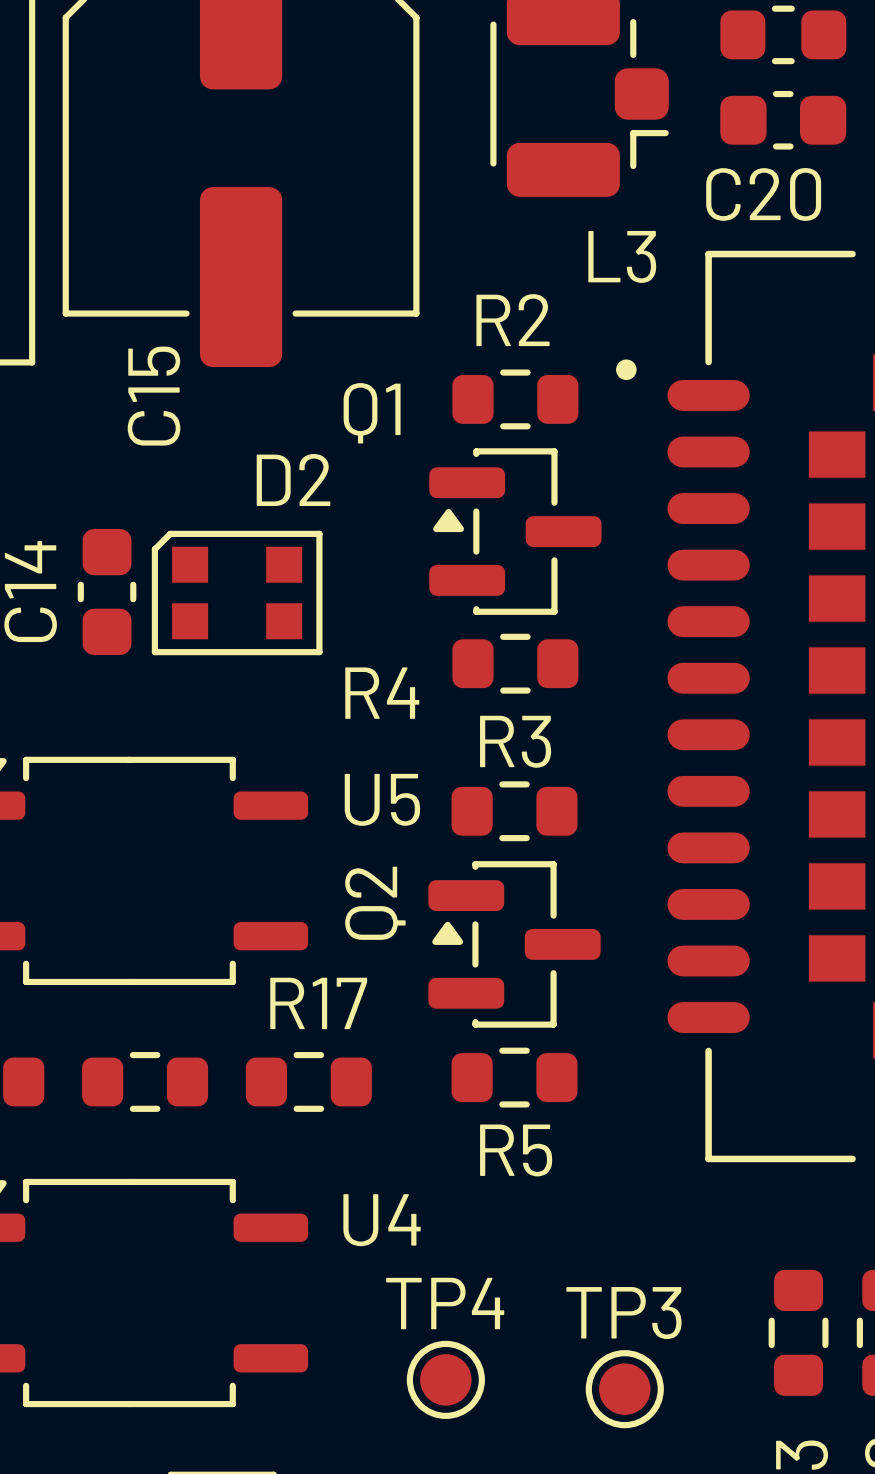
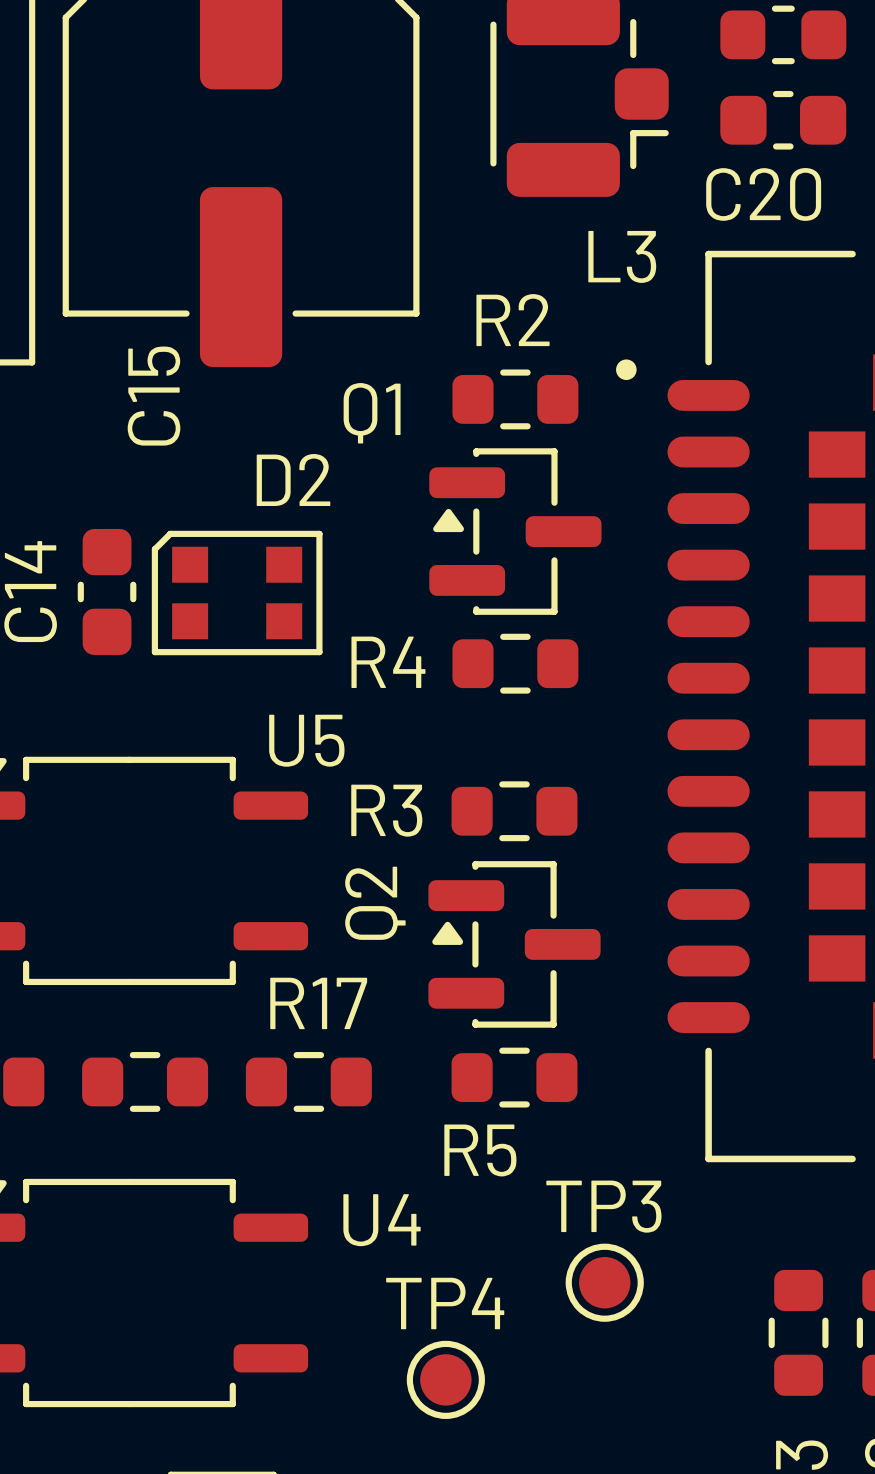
R4 name position: R4 (382, 693) -> R4 (388, 662)
R3 name position: R3 (515, 741) -> R3 (386, 810)
U5 name position: U5 (382, 799) -> U5 (306, 740)
R5 name position: R5 (516, 1150) -> R5 (480, 1150)
TP3 position: (624, 1389) -> (604, 1282)

